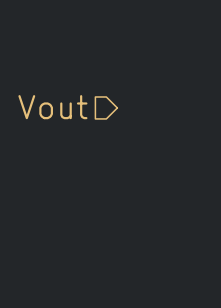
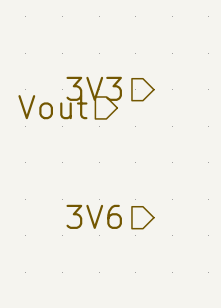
hierarchical label: none -> 3V3 (94, 88)
hierarchical label: none -> 3V6 (94, 216)

